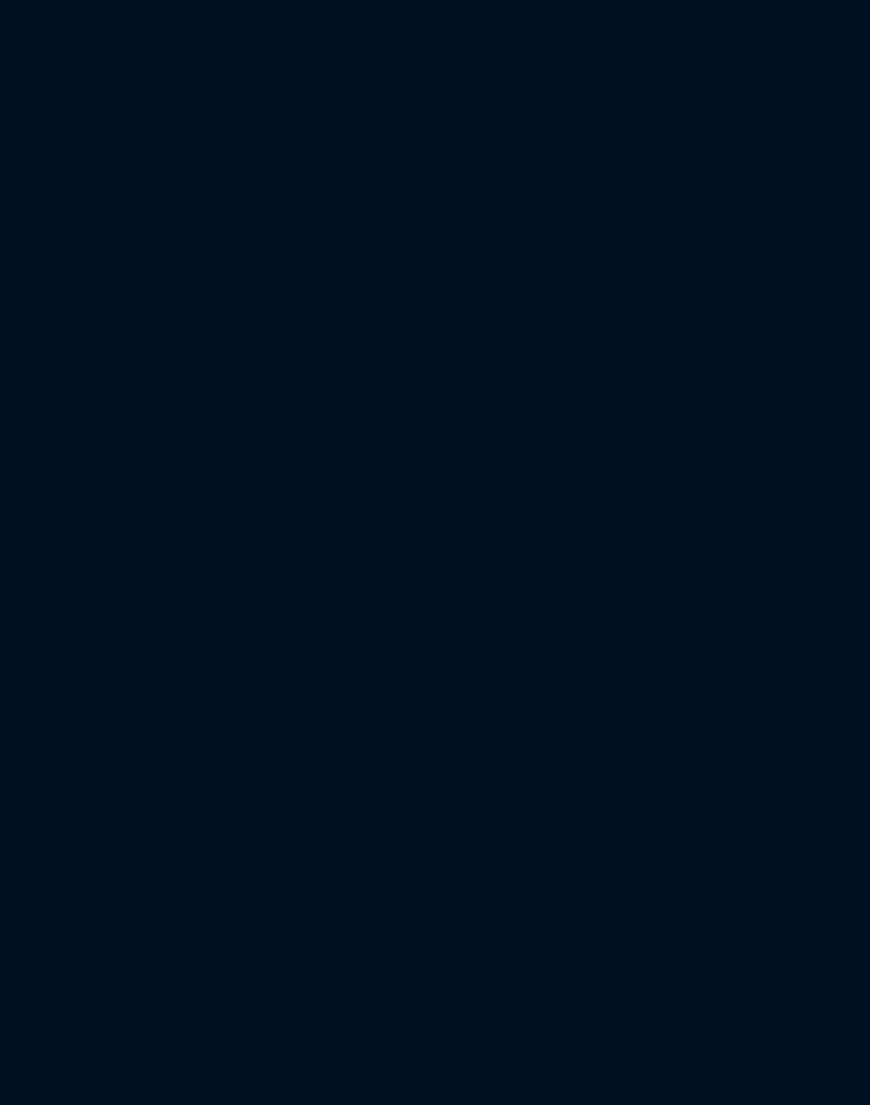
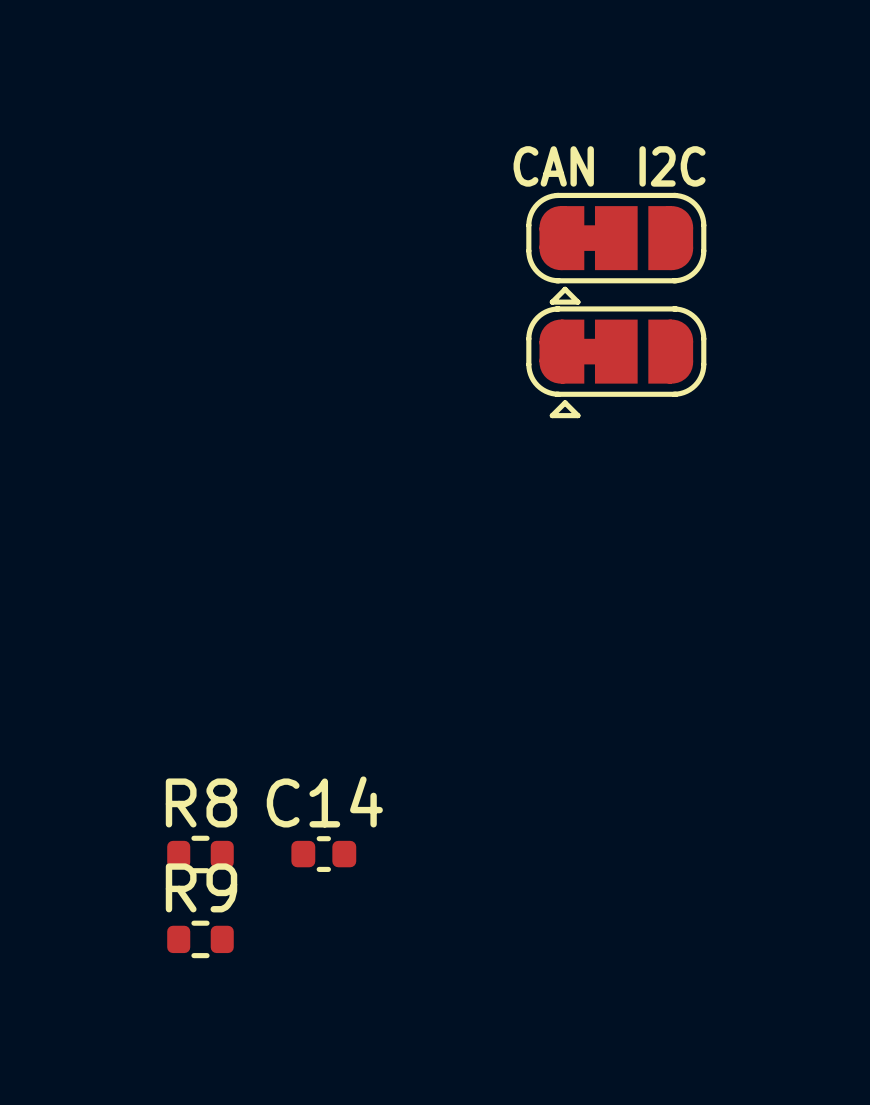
text: none -> CAN (553, 166)
text: none -> I2C (672, 166)
part: none -> (616, 248)
part: none -> (616, 362)
R8: none -> (200, 854)
C14: none -> (323, 854)
R9: none -> (200, 939)

